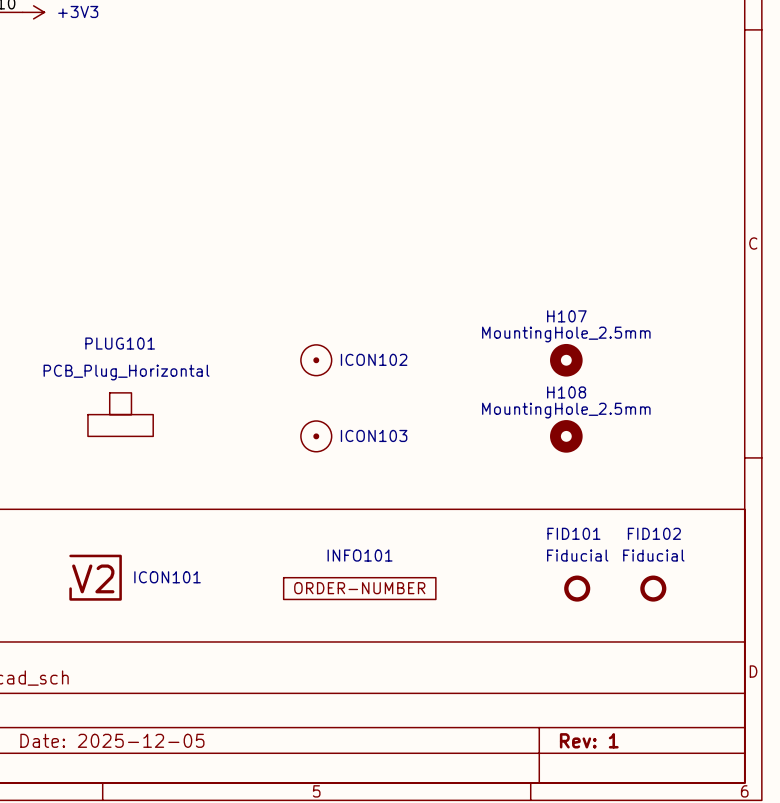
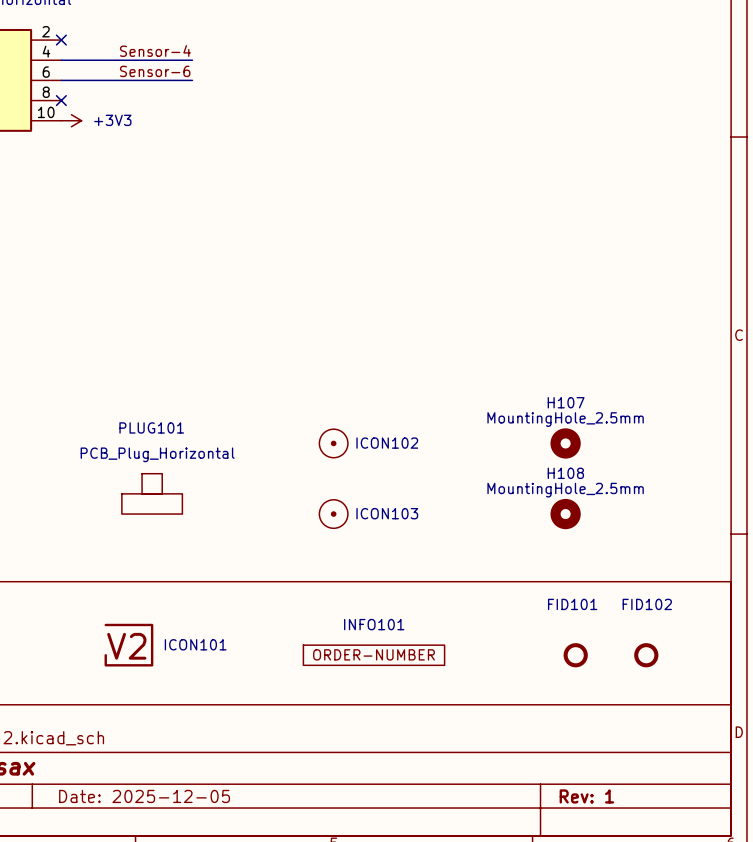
FID101 value: Fiducial (577, 555) -> none
FID102 value: Fiducial (653, 555) -> none

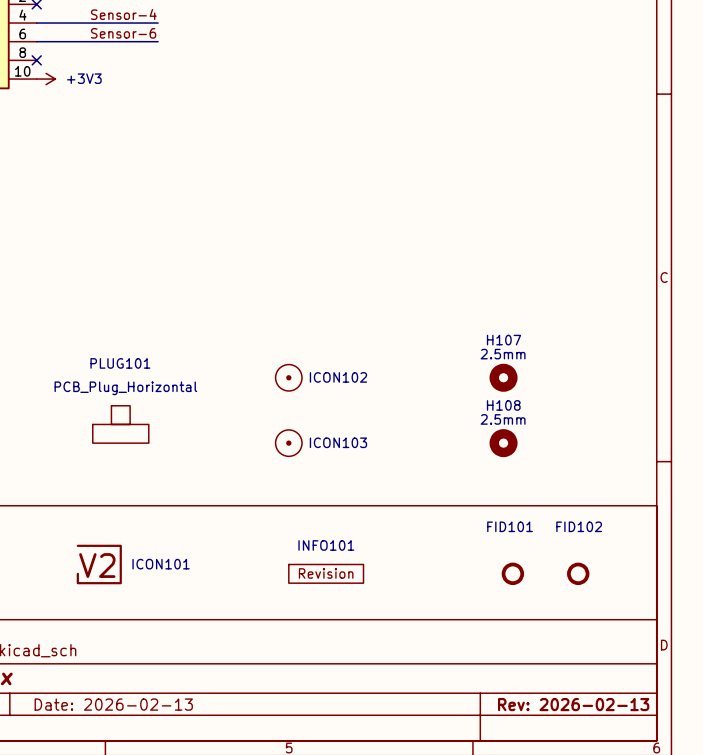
H107 value: MountingHole_2.5mm (565, 419) -> 2.5mm (503, 354)
H108 value: MountingHole_2.5mm (565, 490) -> 2.5mm (503, 419)
INFO101 symbol: [303, 645, 445, 666] -> [288, 564, 364, 584]
title block: Date: 2025-12-05 (144, 796) -> Date: 2026-02-13 (113, 704)
title block: Rev: 1 (586, 796) -> Rev: 2026-02-13 (573, 704)

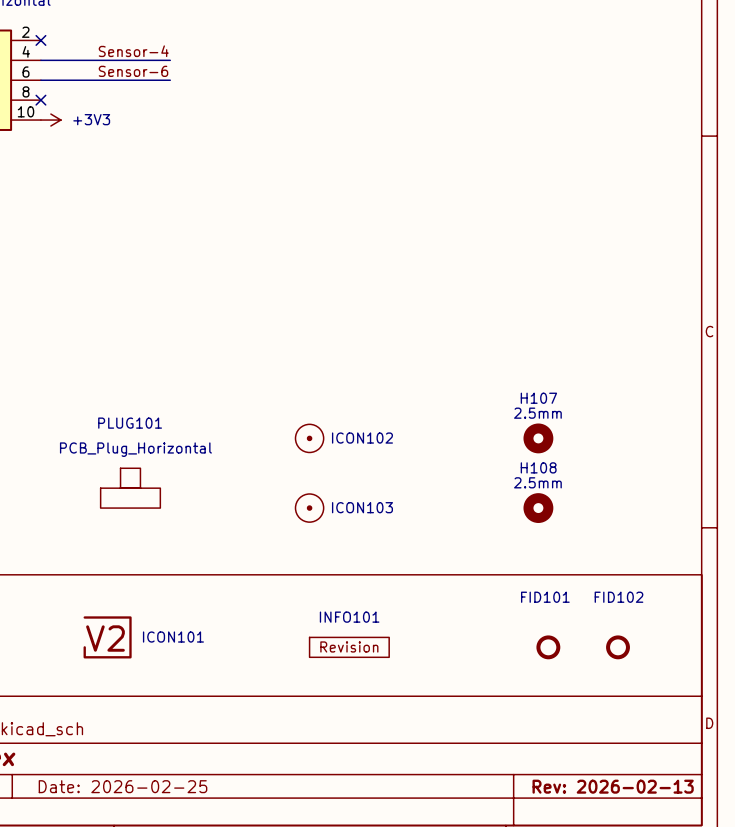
title block: Date: 2026-02-13 (113, 704) -> Date: 2026-02-25 (123, 786)

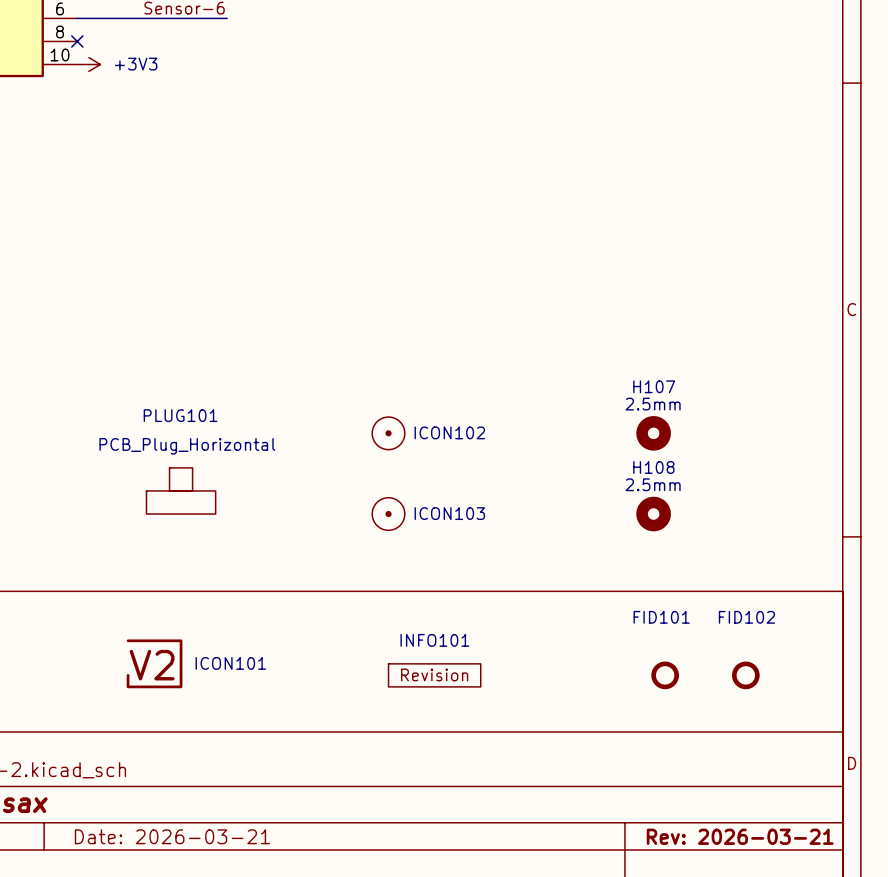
title block: Date: 2026-02-25 (123, 786) -> Date: 2026-03-21 (172, 836)
title block: Rev: 2026-02-13 (613, 786) -> Rev: 2026-03-21 (740, 836)

